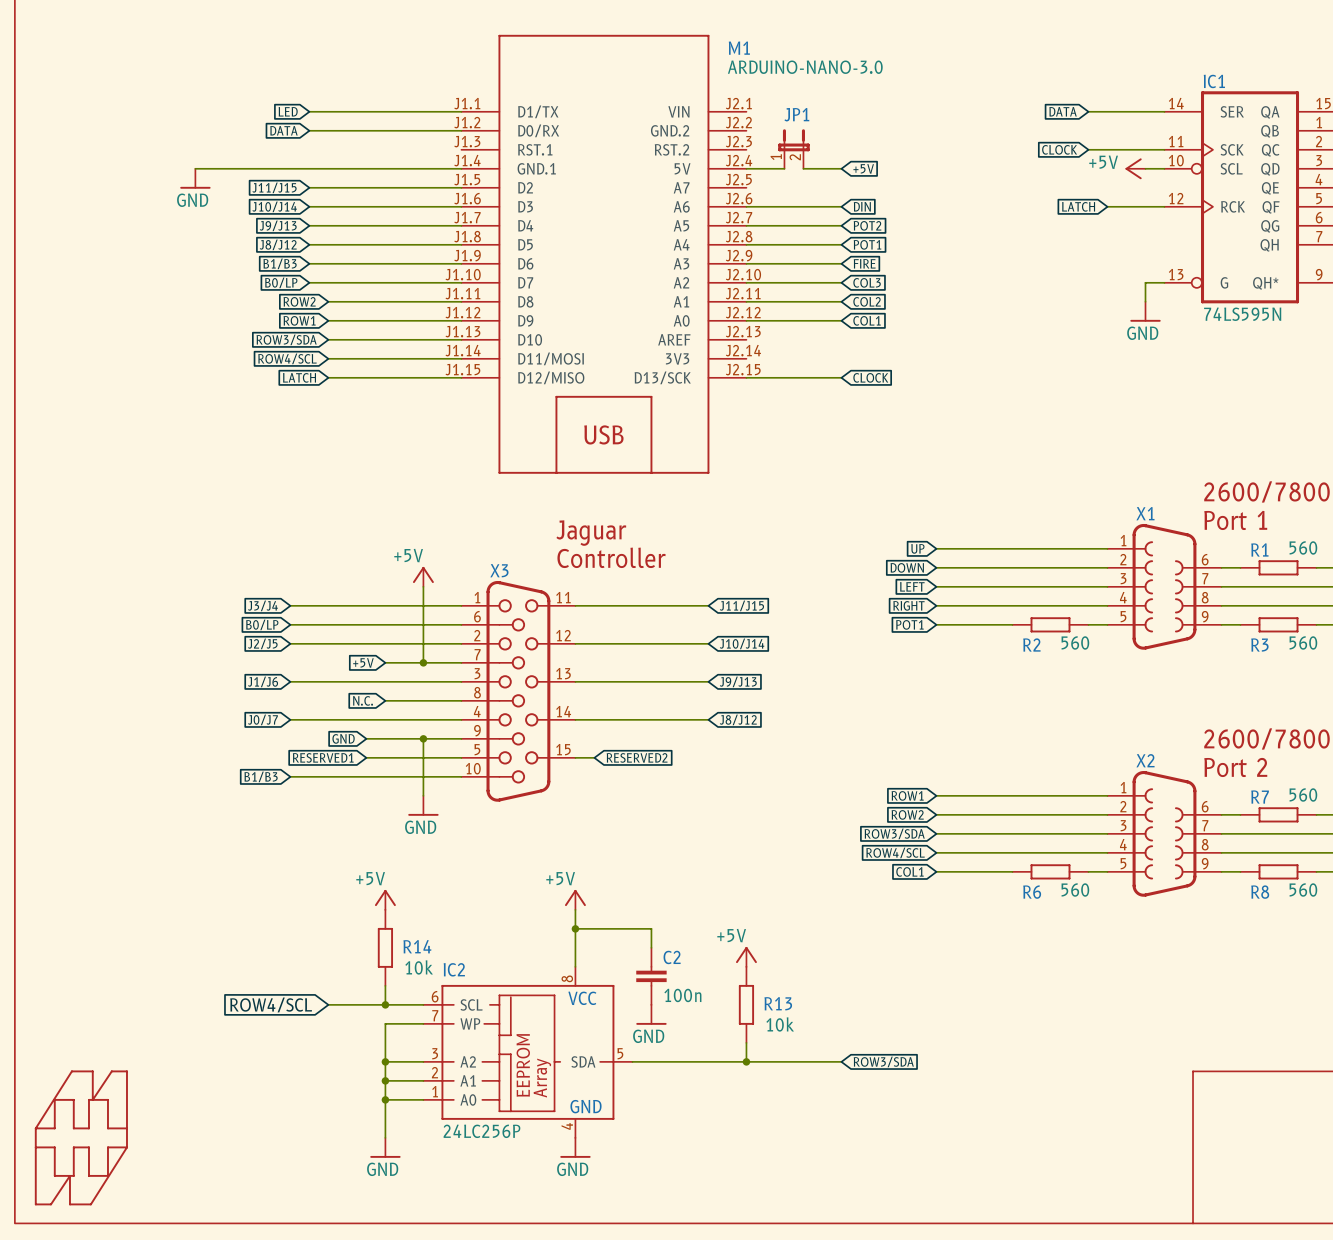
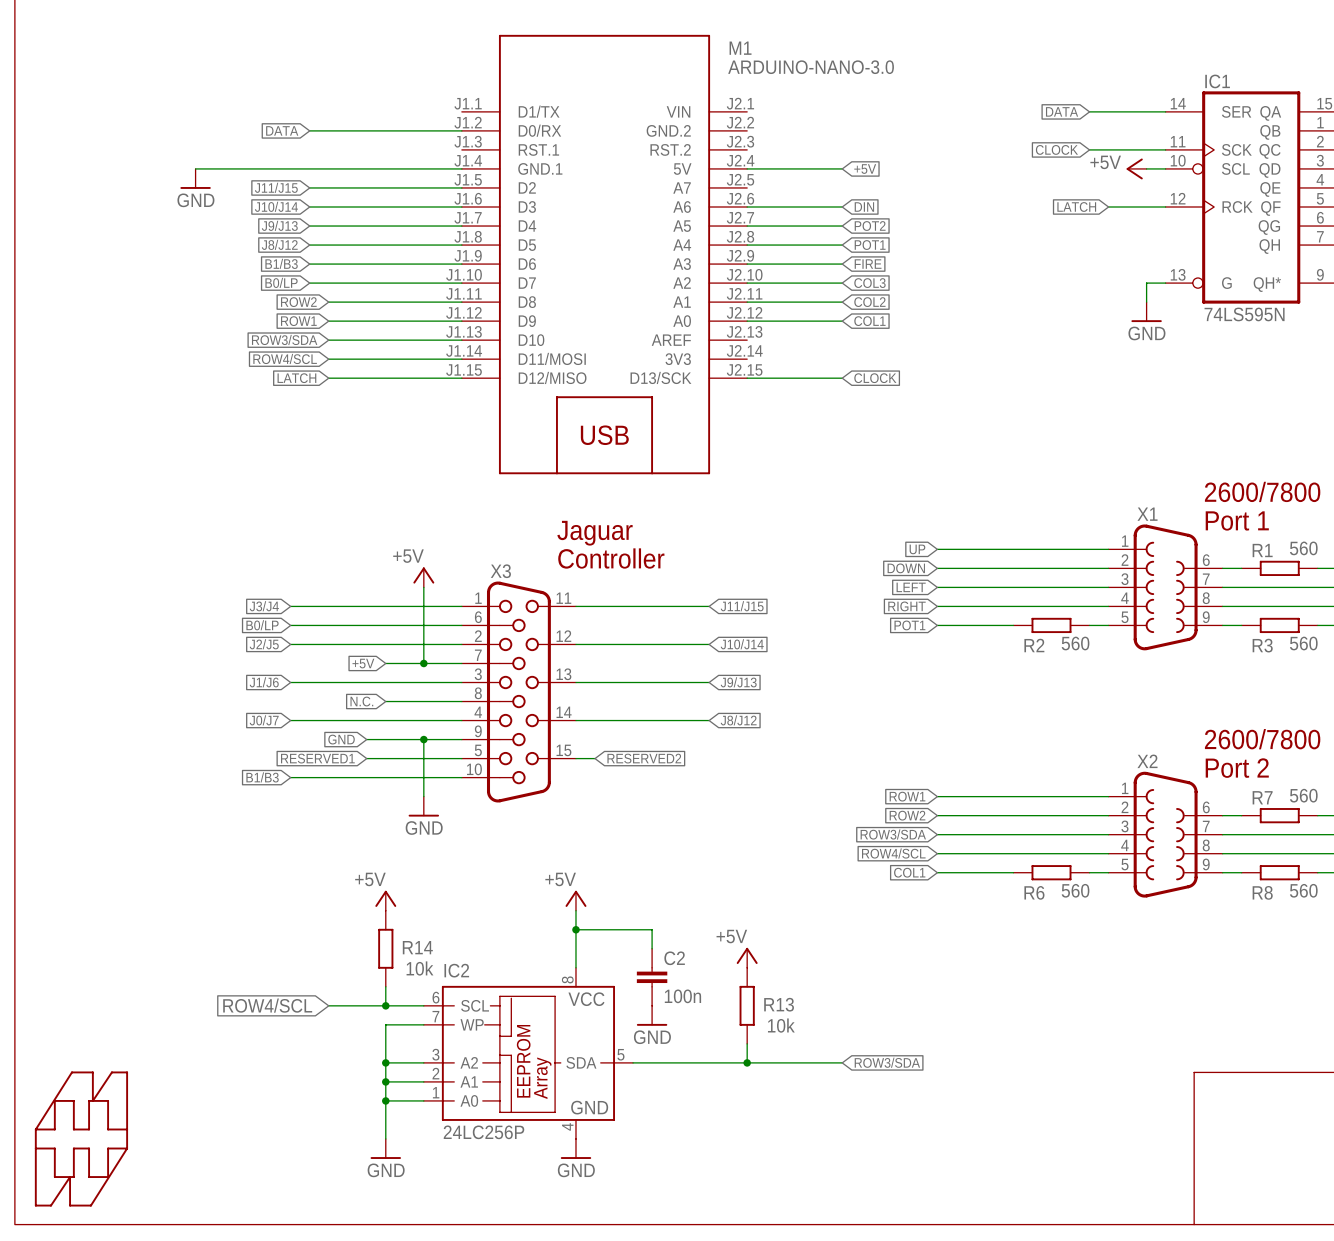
global label: LED (288, 111) -> none
wire: (309, 111) (461, 111) -> none
JP1: (793, 149) -> none
wire: none -> (785, 168) (804, 168)

